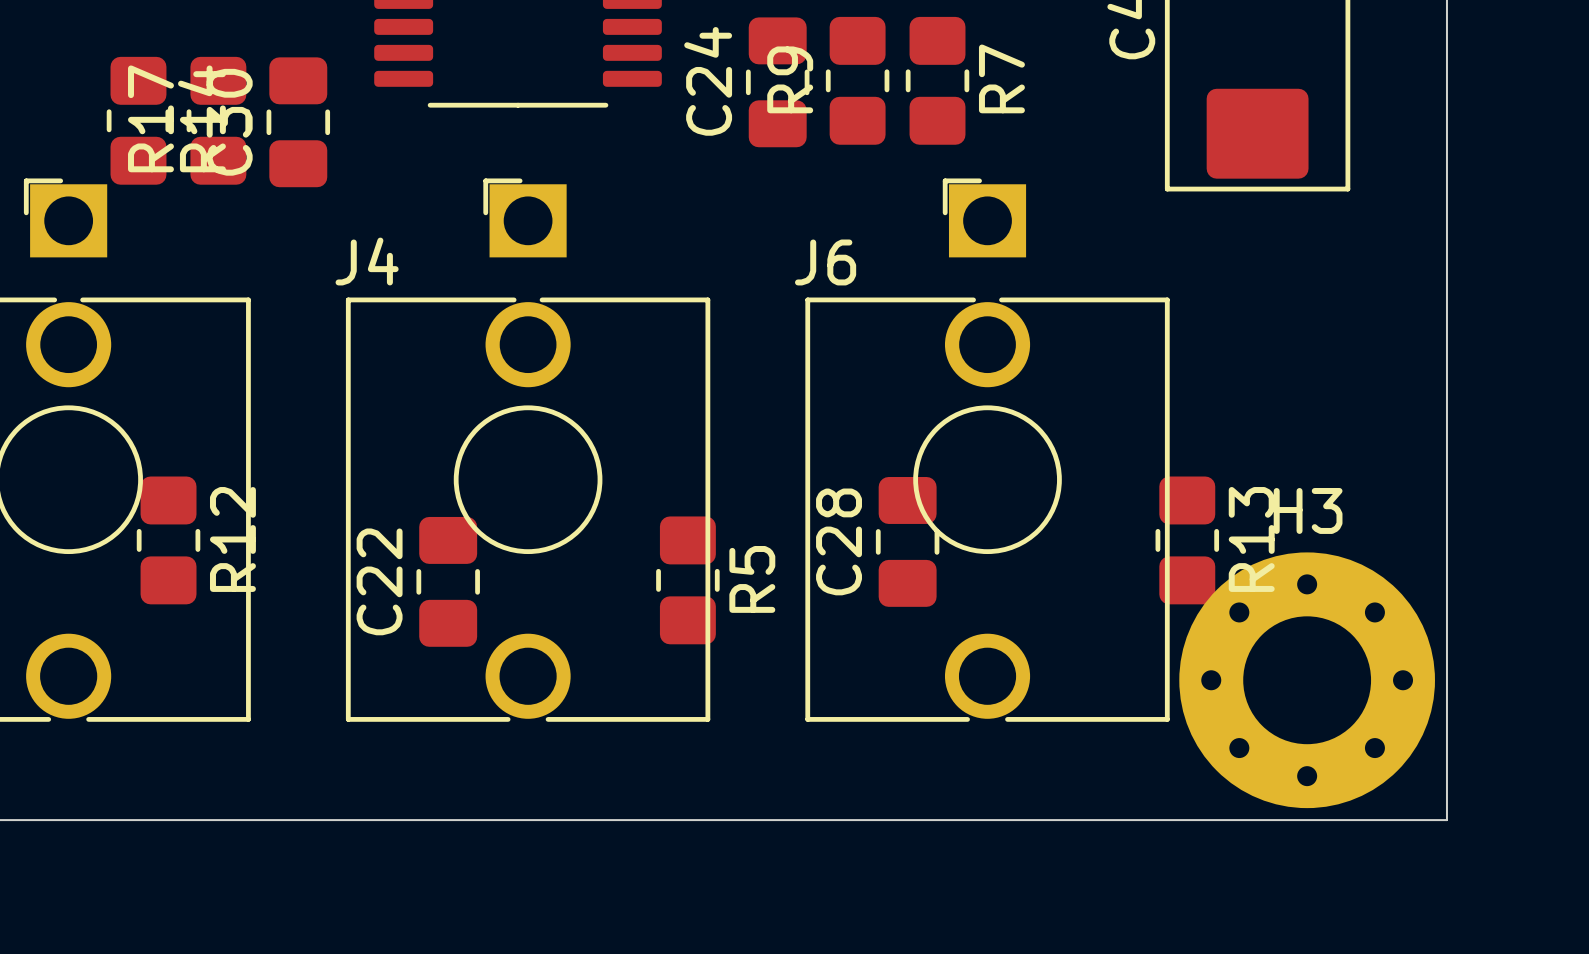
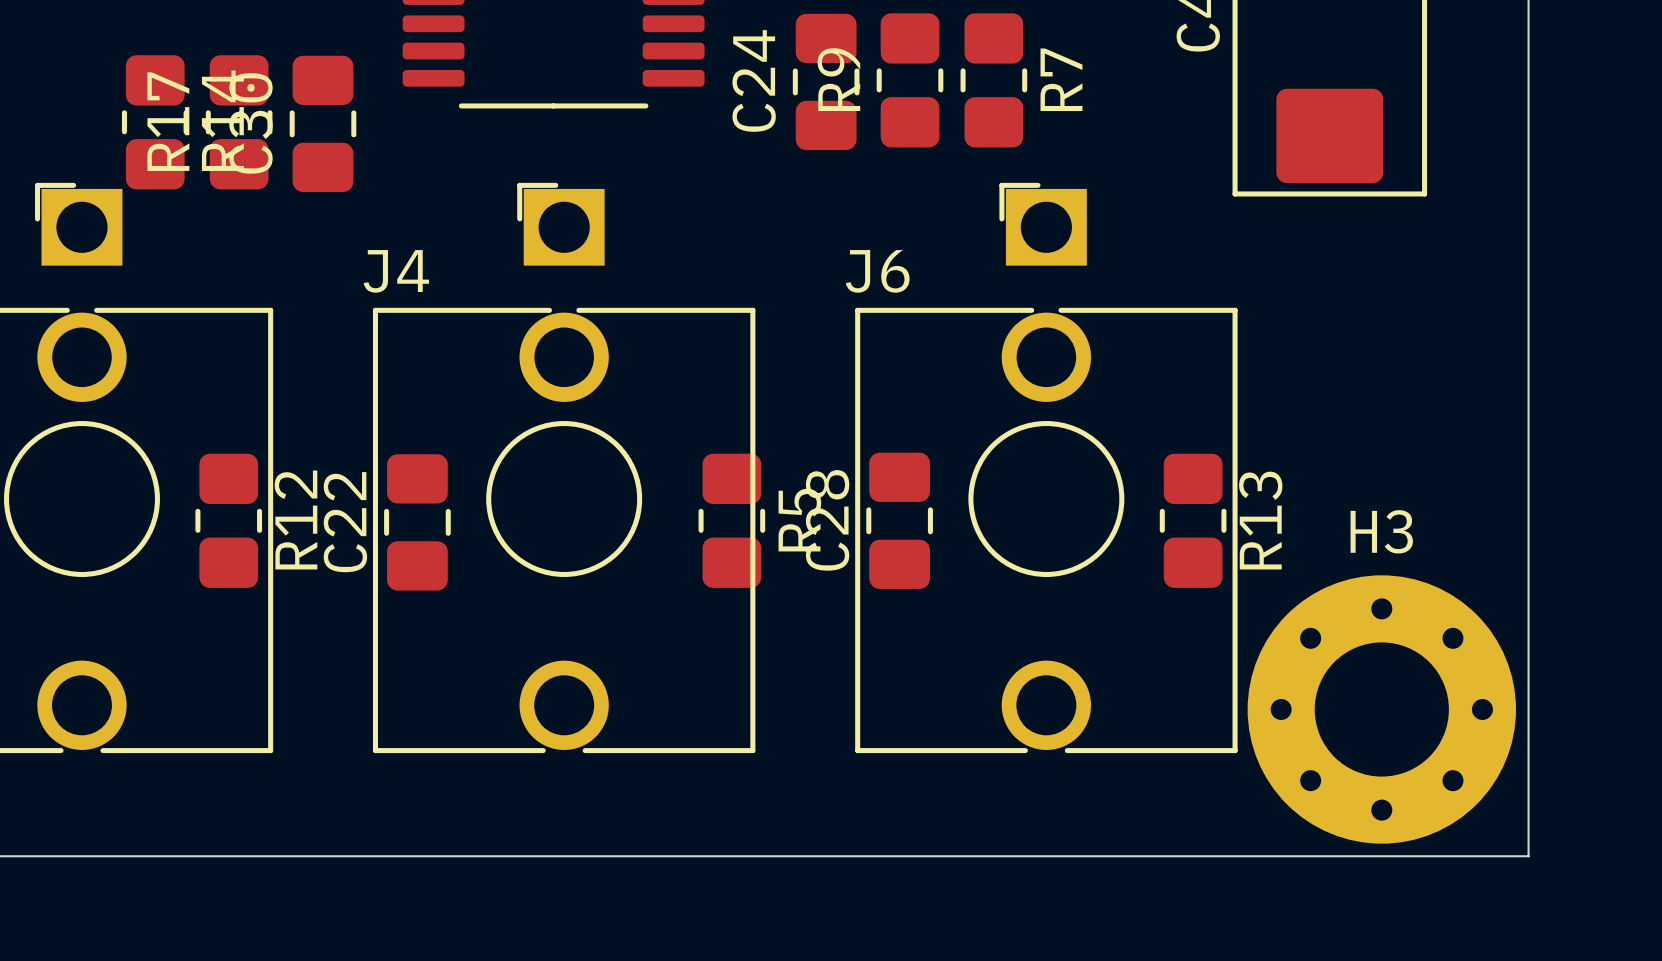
R12 position: (168, 540) -> (228, 520)
R13 position: (1187, 540) -> (1193, 520)
C28 position: (907, 541) -> (899, 520)
R5 position: (687, 580) -> (731, 520)
C22 position: (448, 581) -> (417, 522)

